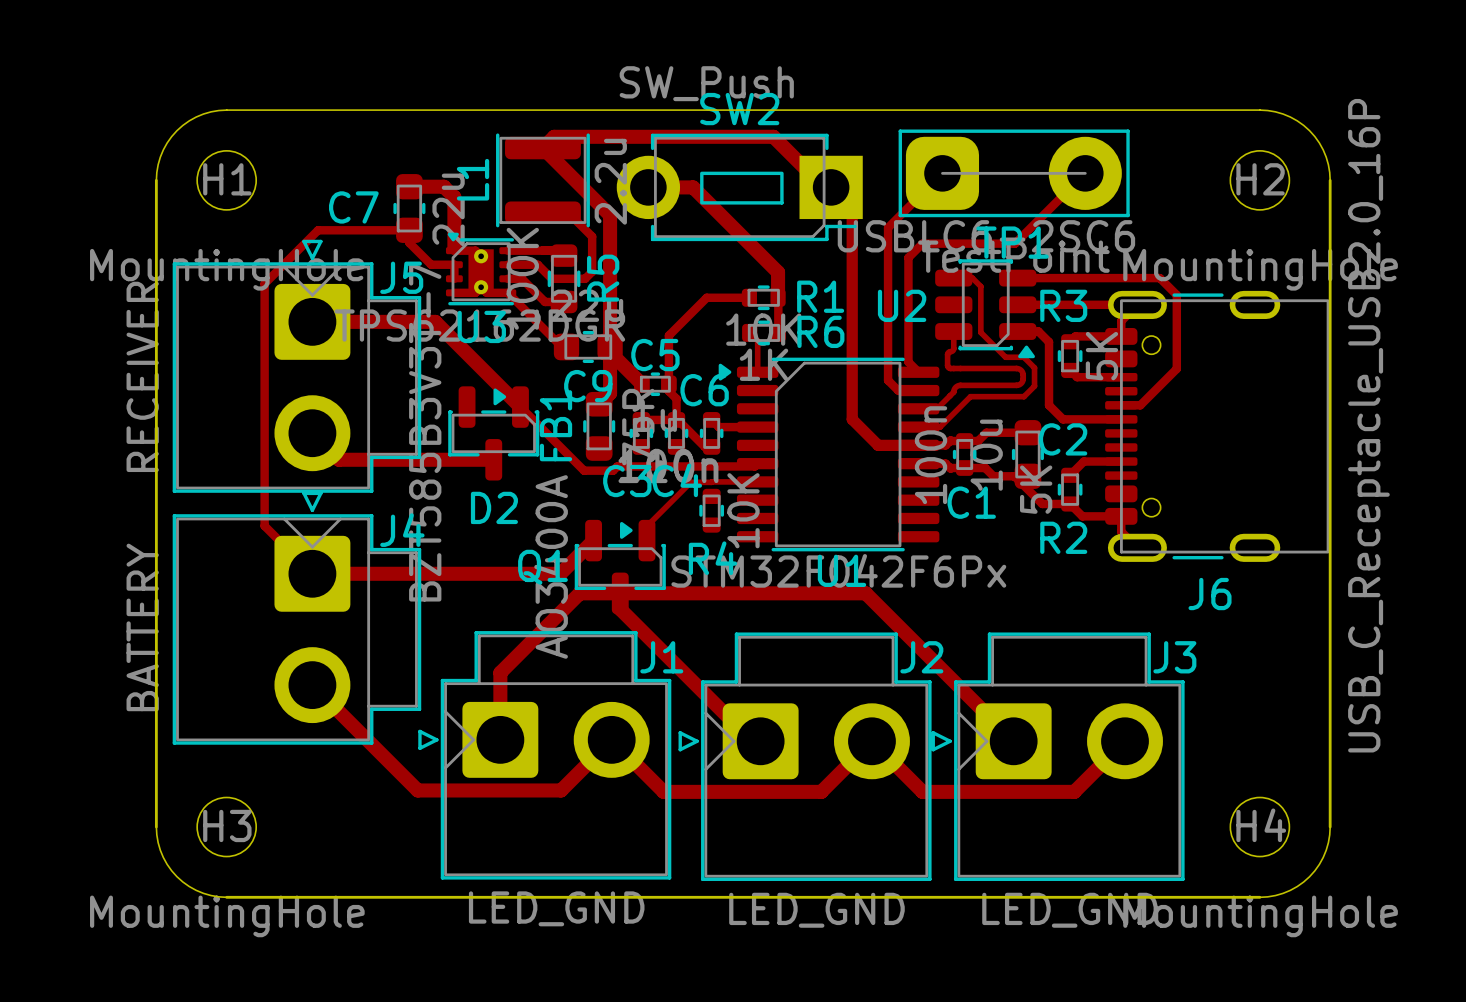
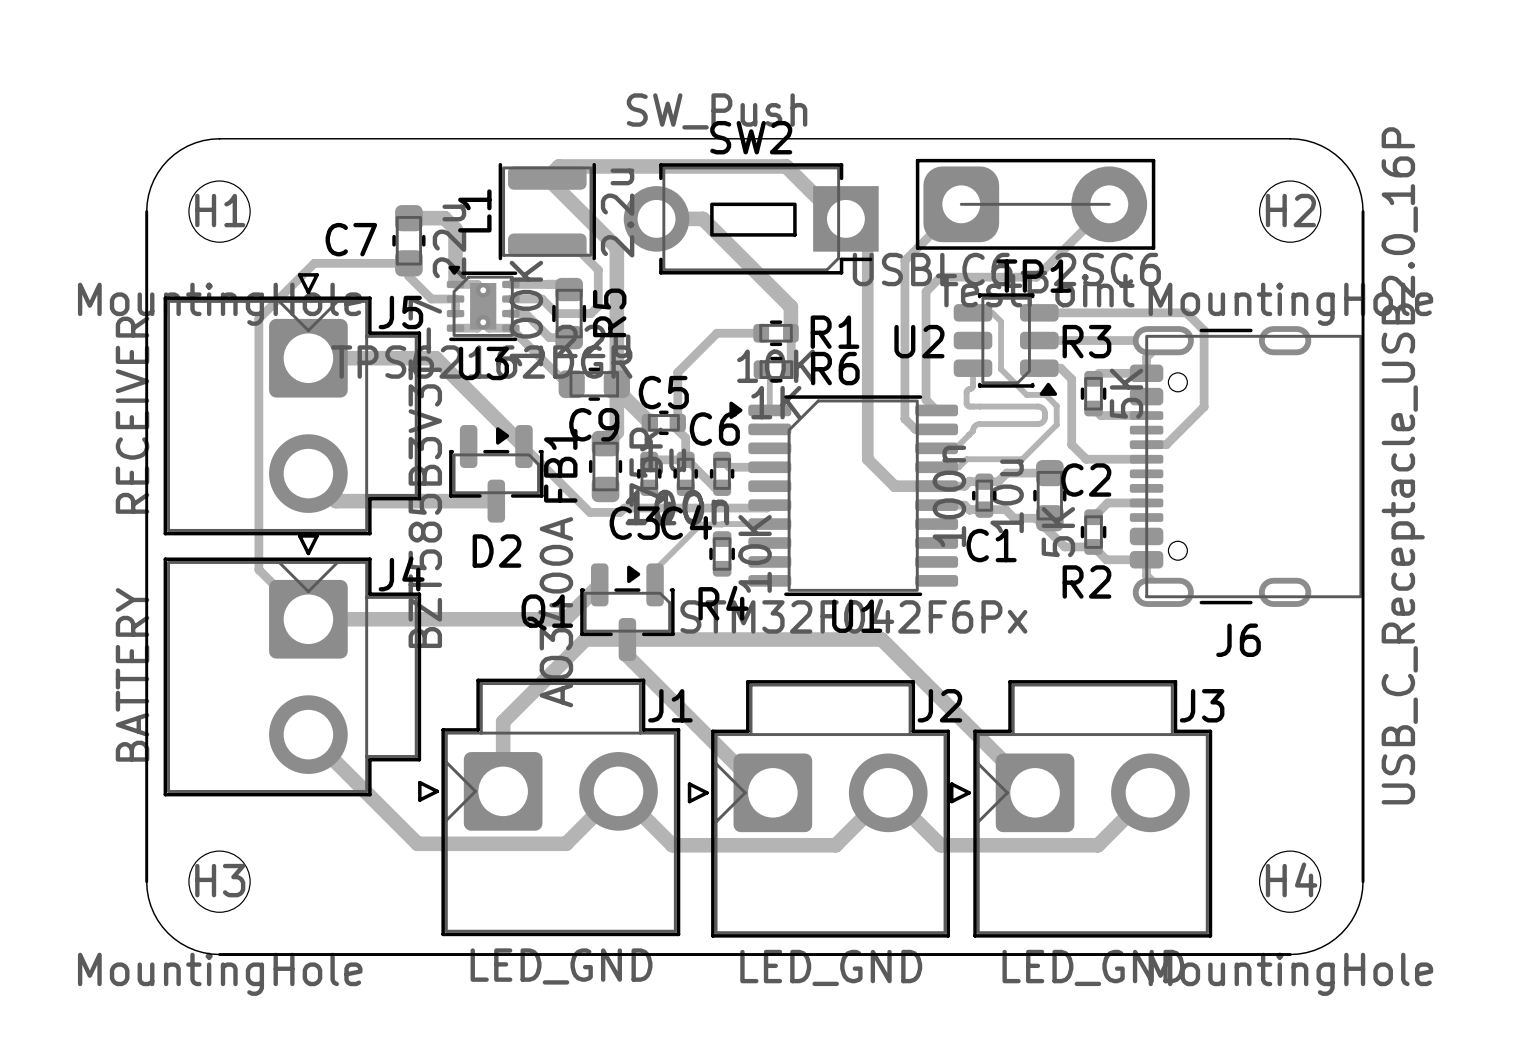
track: (1024, 396) (970, 396) (947, 419) -> (1045, 435) (1022, 459) (966, 459)

